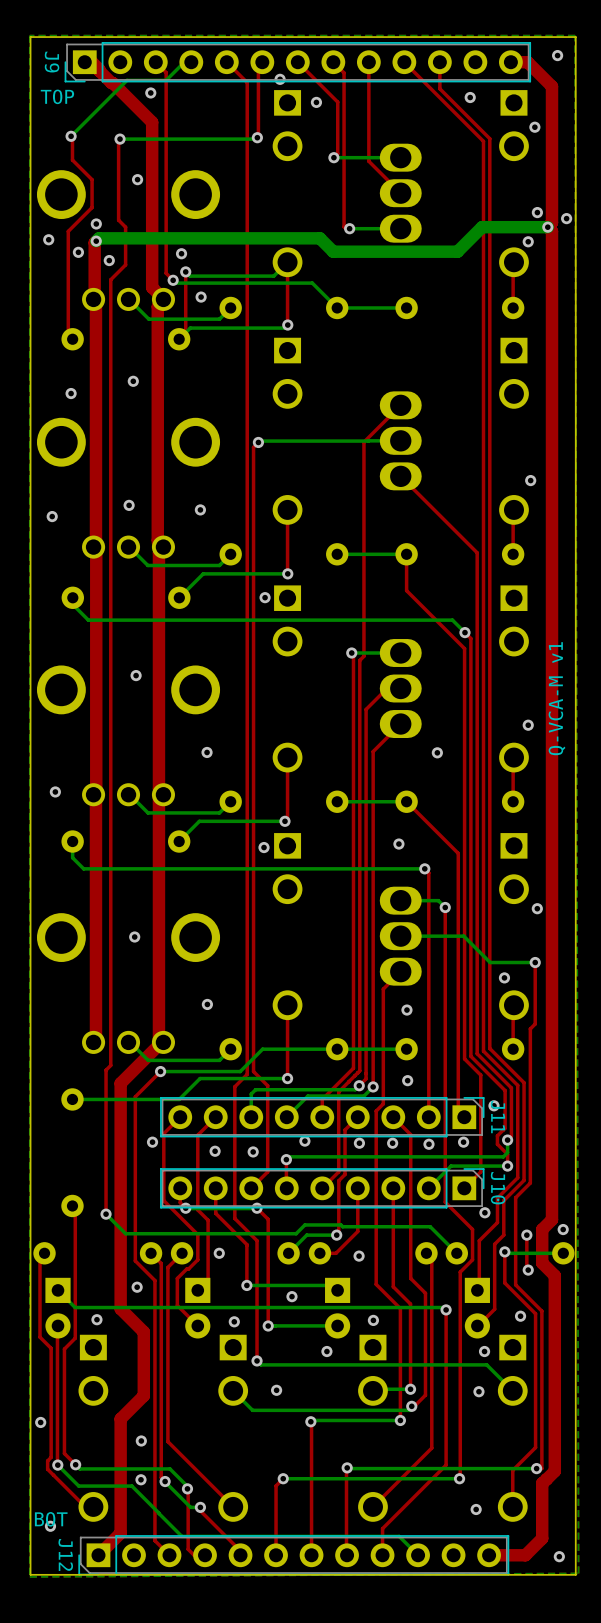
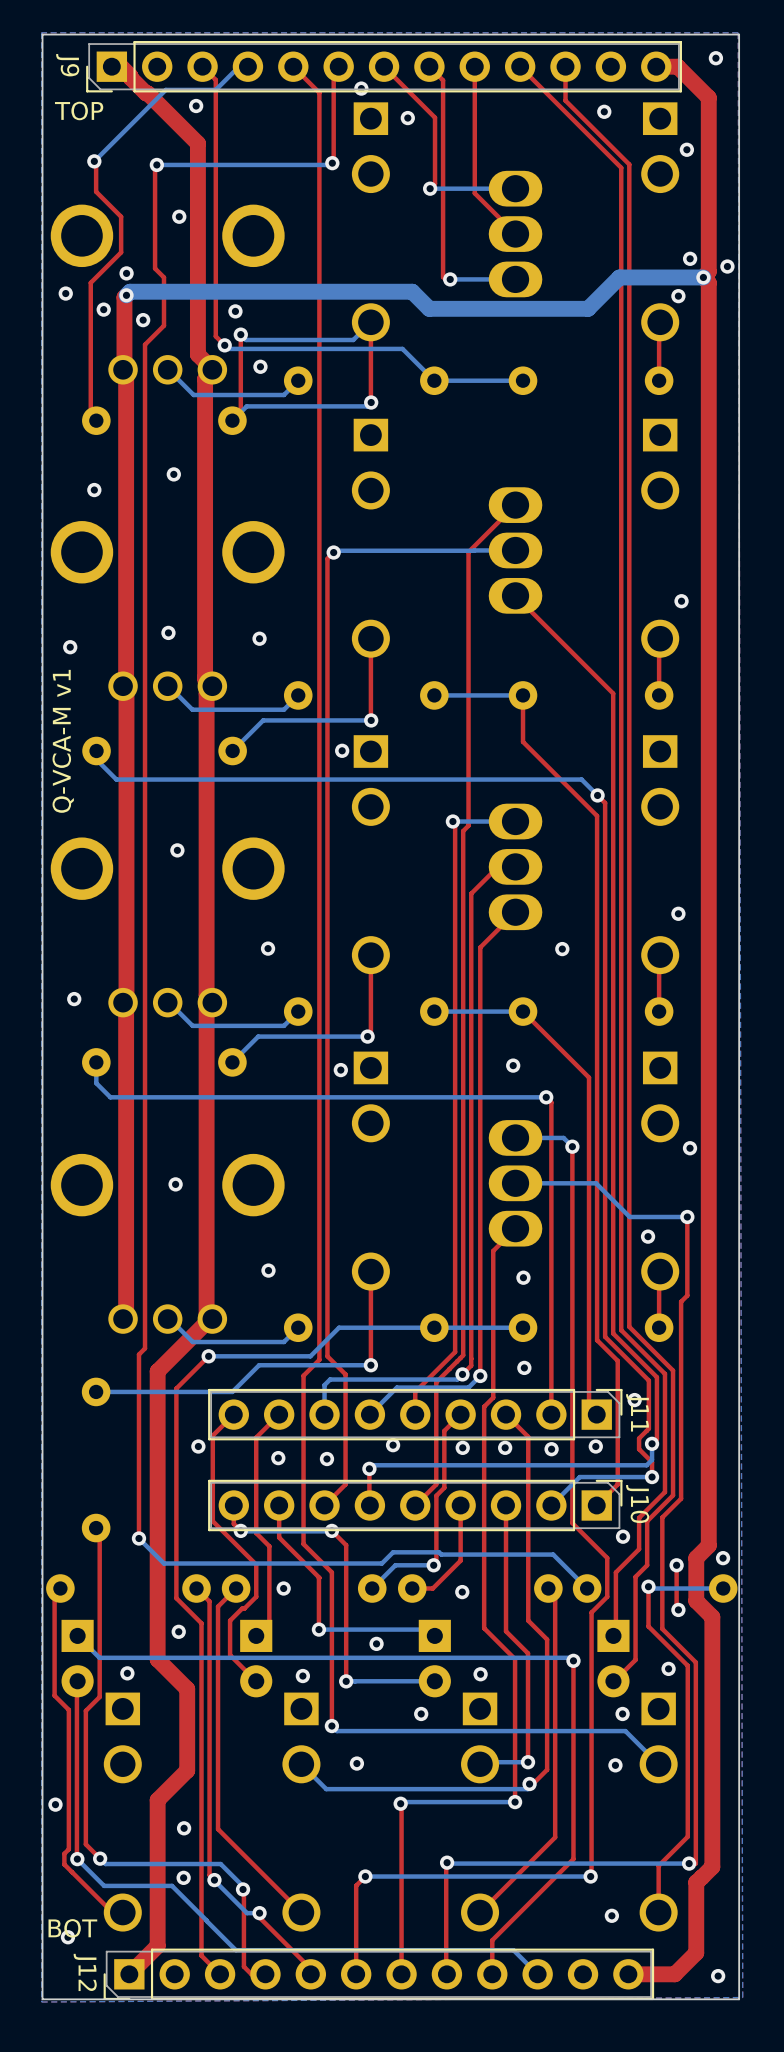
text: none -> Q-VCA-M v1 (63, 741)
text: Q-VCA-M v1 (557, 698) -> none

